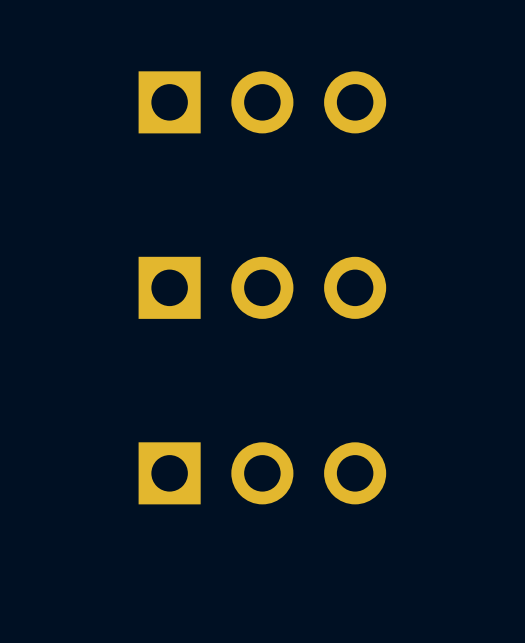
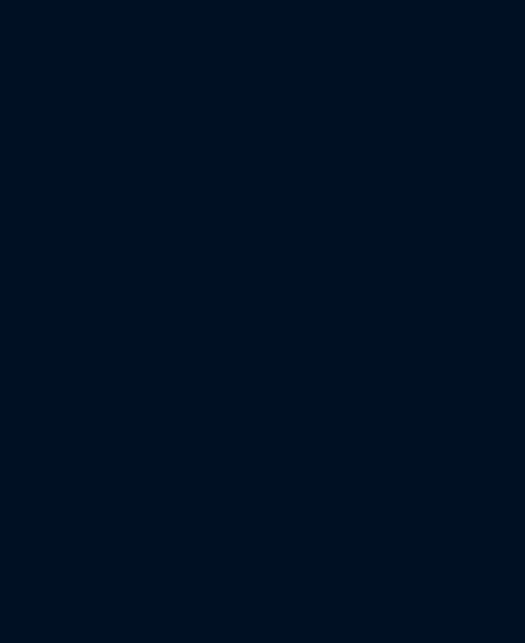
part: (262, 102) -> none
part: (262, 287) -> none
part: (262, 473) -> none

